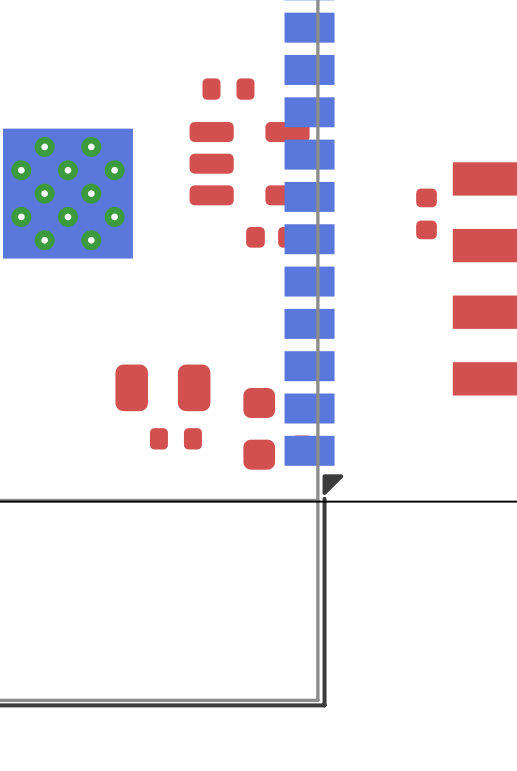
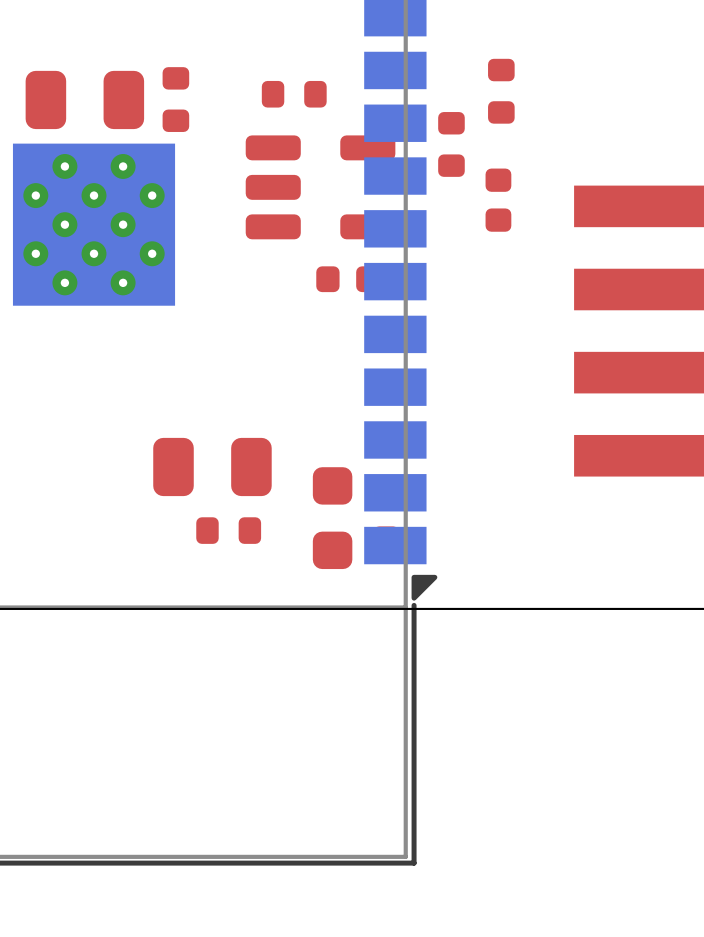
part: none -> (501, 91)
part: none -> (84, 99)
part: none -> (175, 99)
part: none -> (451, 144)
part position: (426, 213) -> (498, 200)

